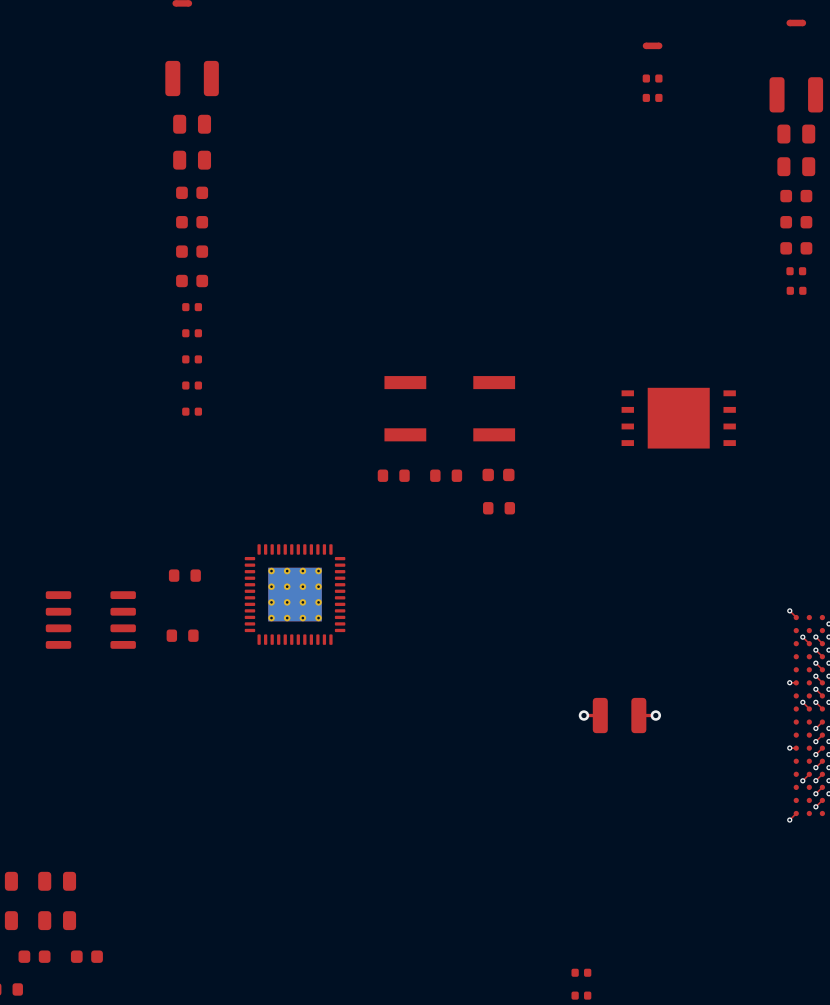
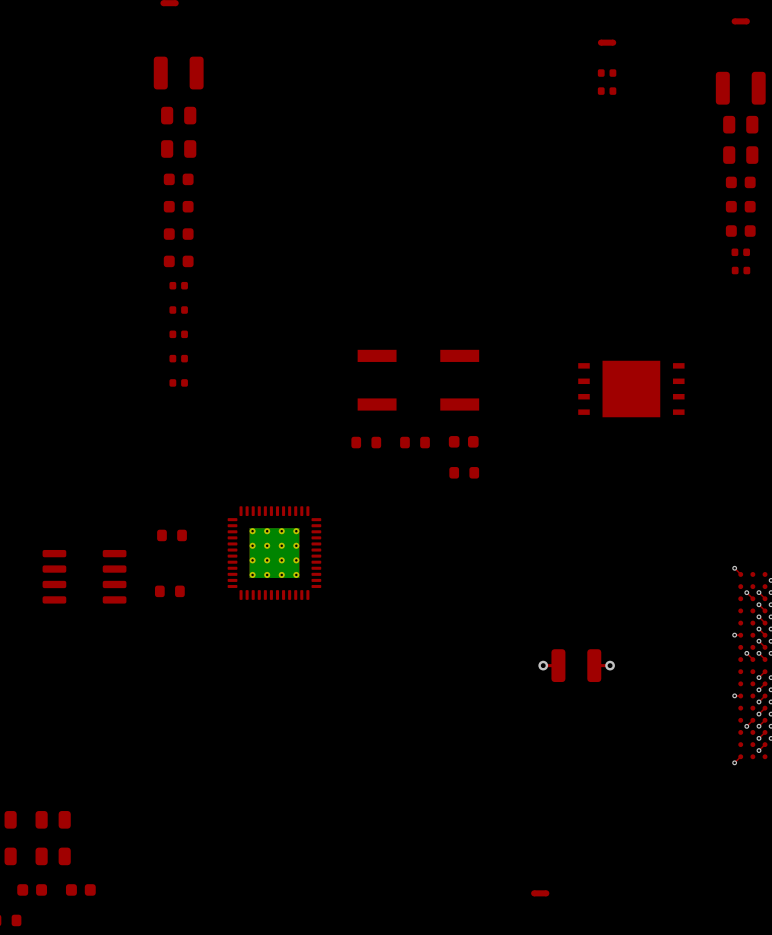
part footprint: [571, 968, 592, 977] -> [531, 890, 550, 897]
part: (581, 995) -> none

